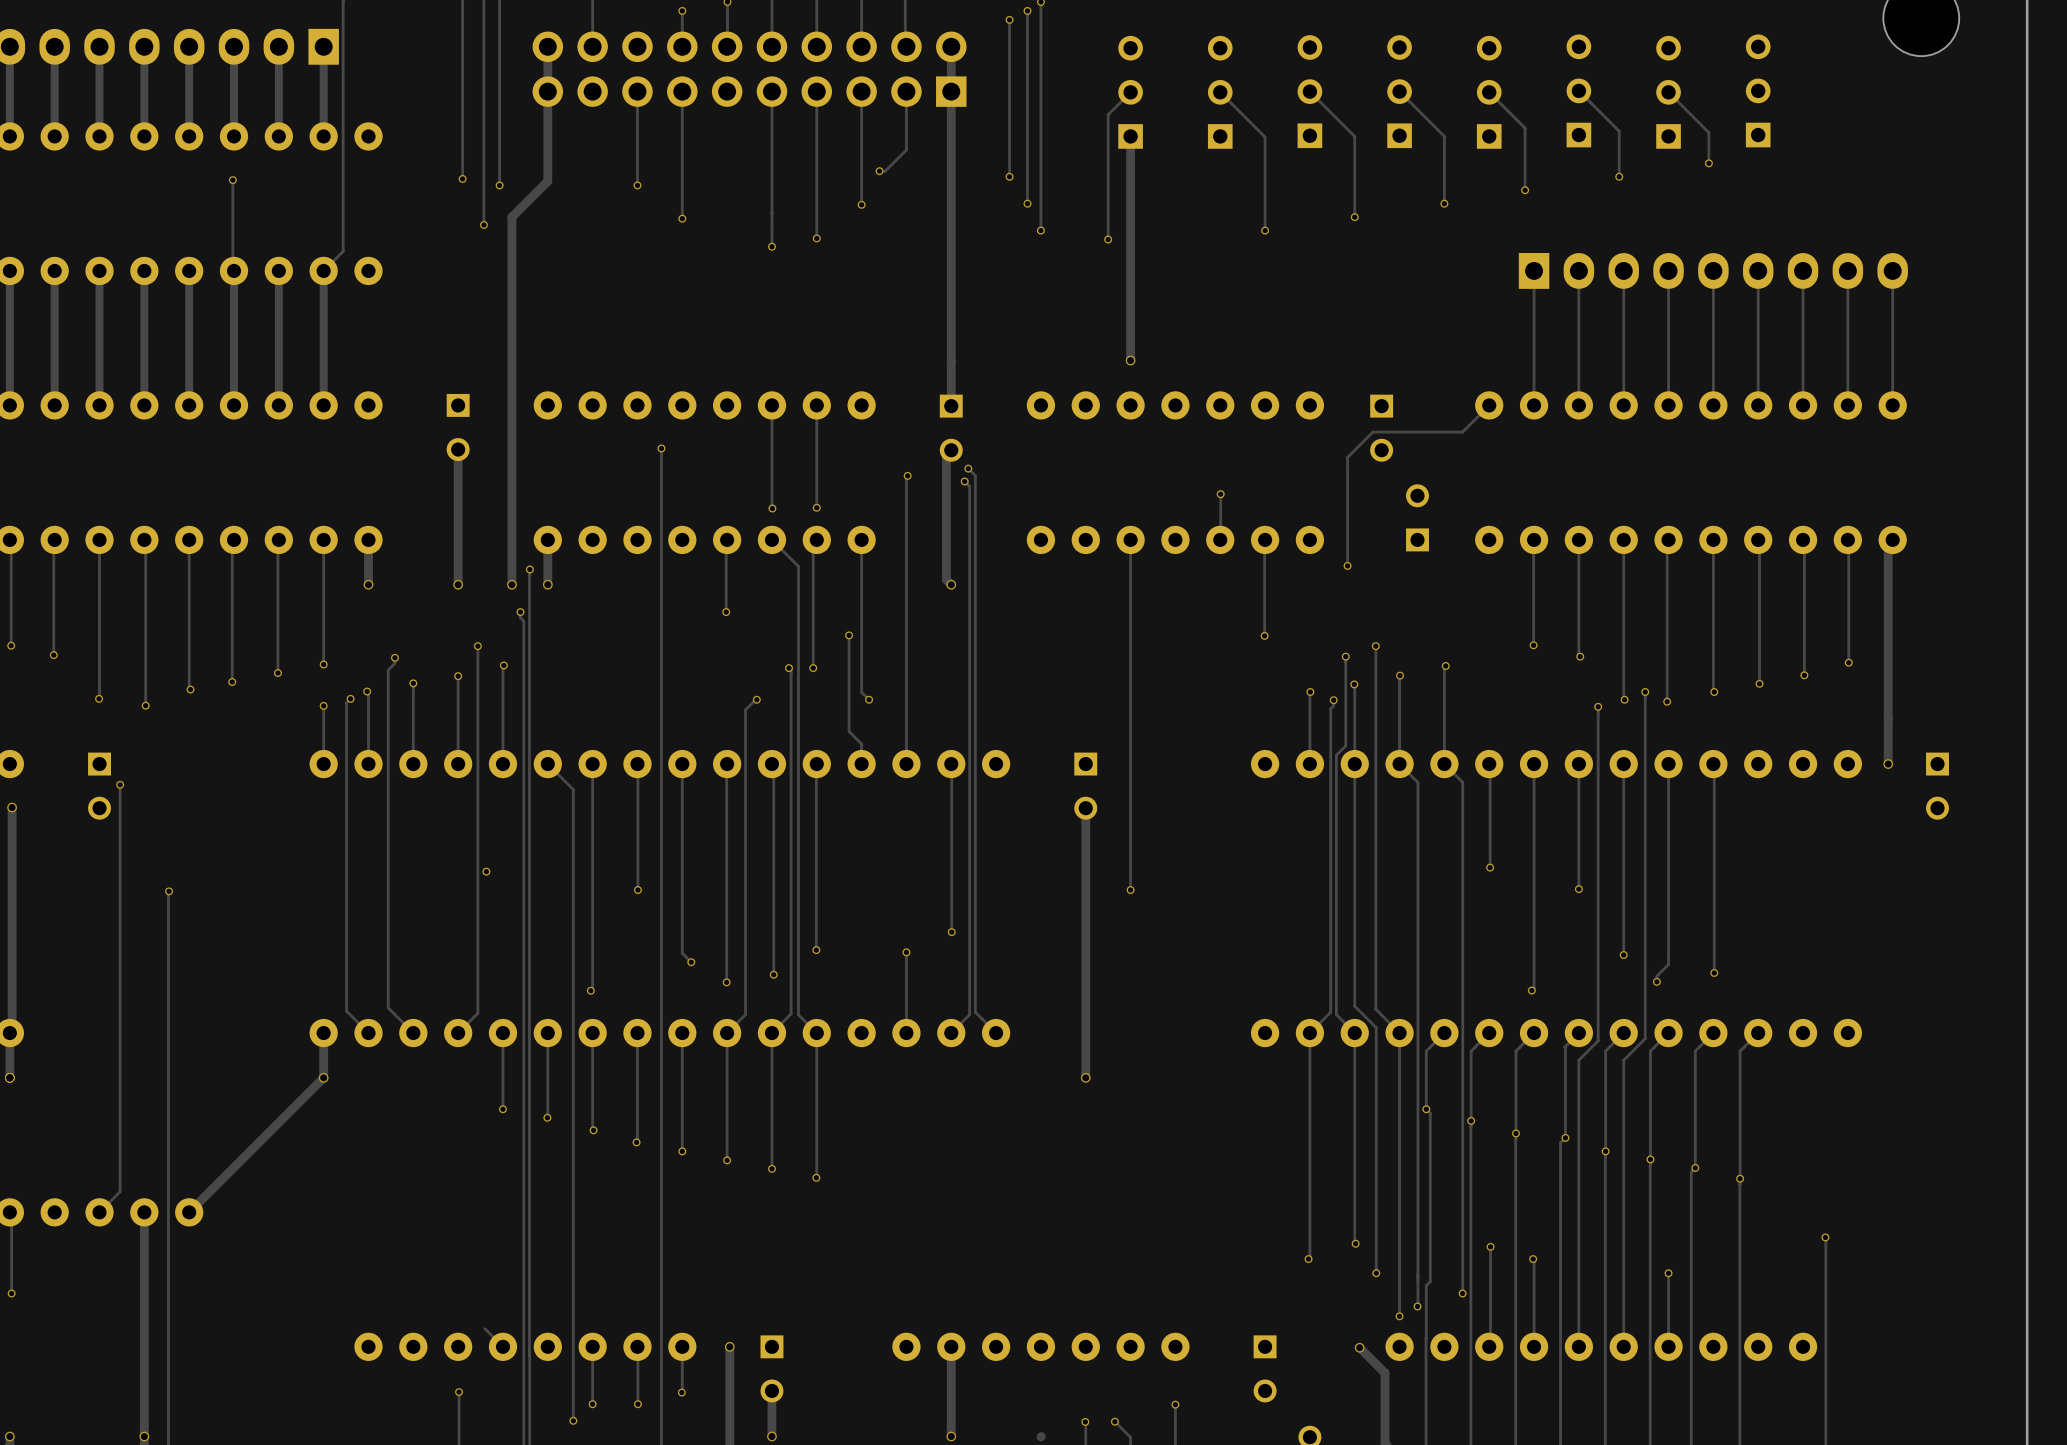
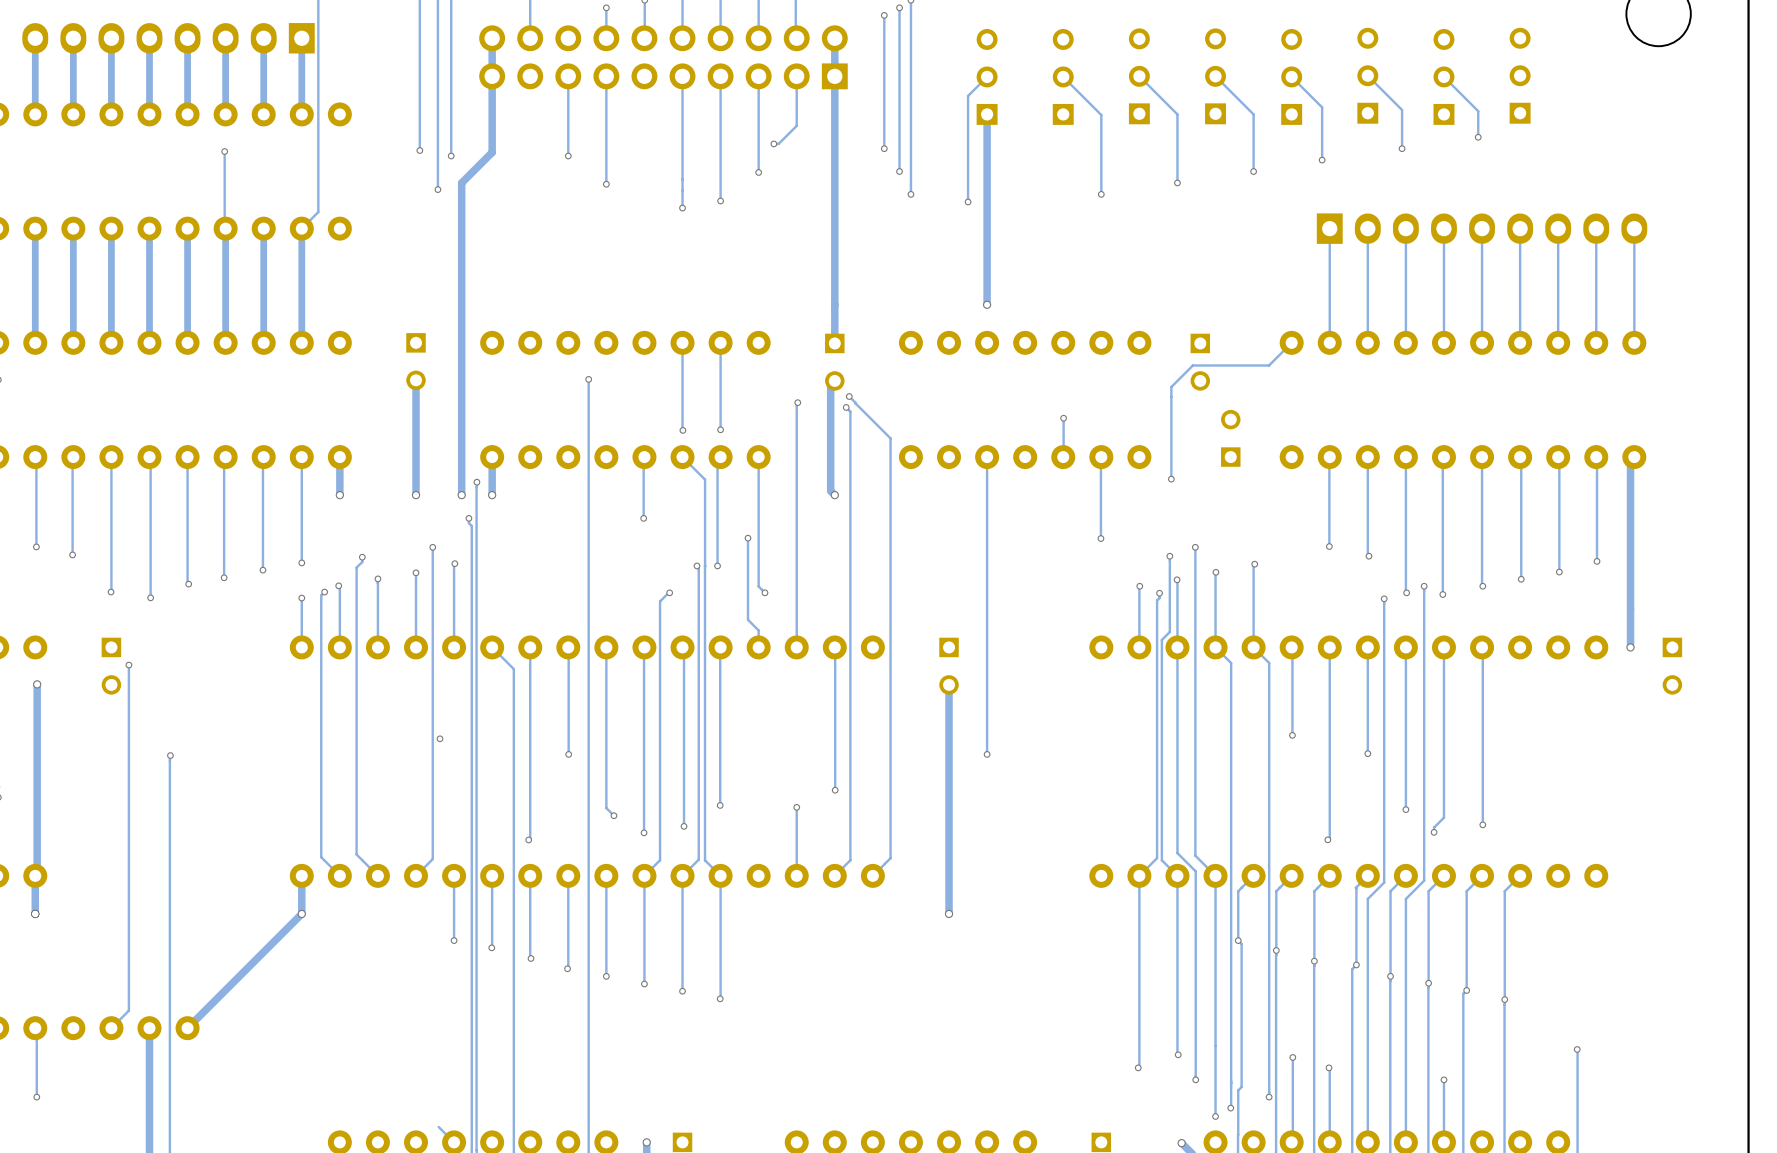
track: (975, 476) (975, 1012) (996, 1033) -> (855, 403) (890, 438) (890, 858) (872, 875)

